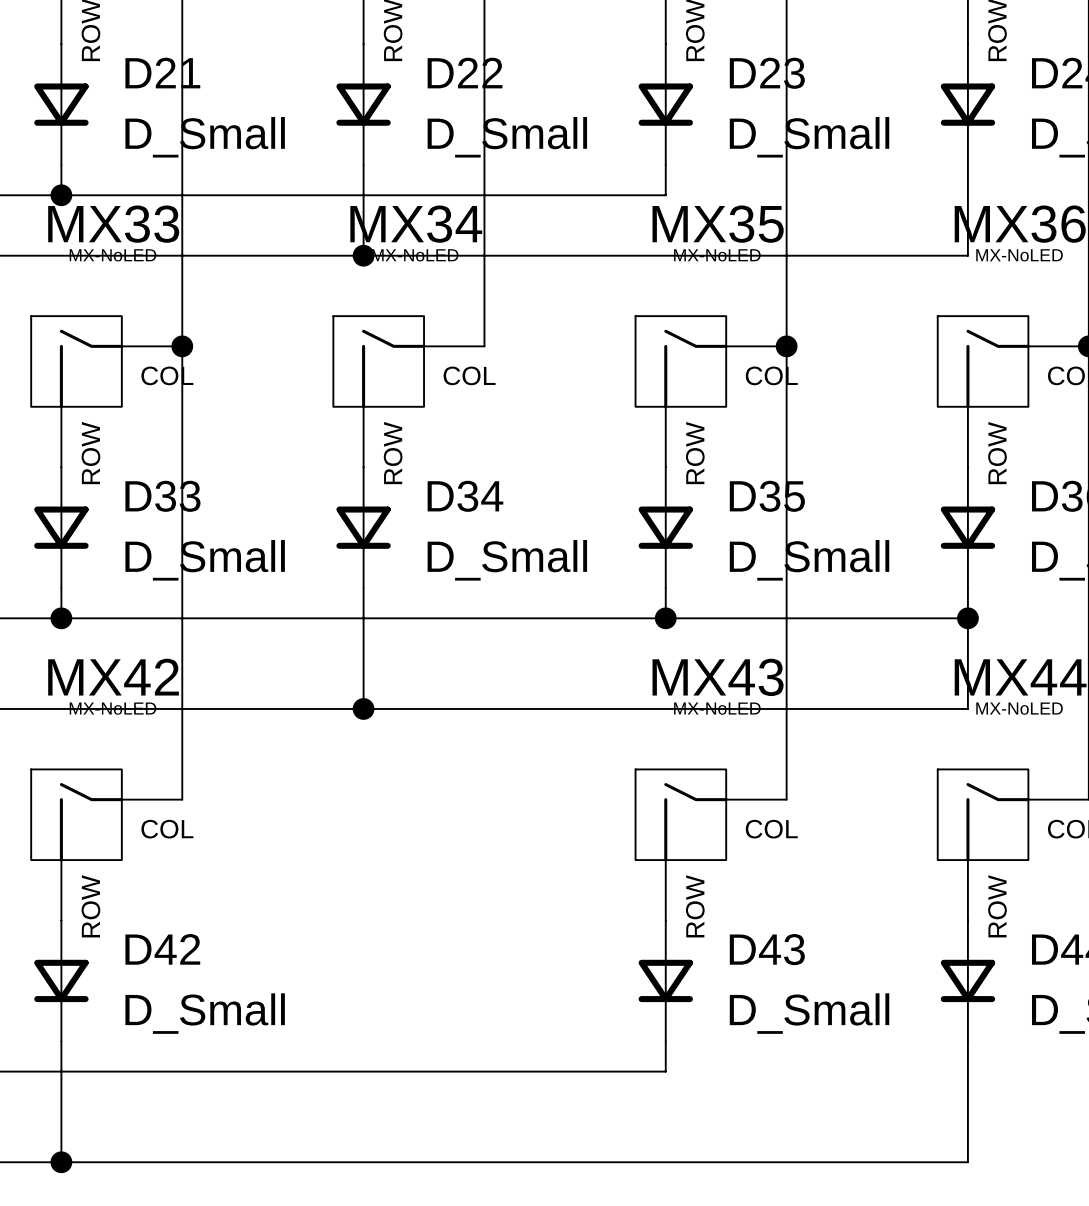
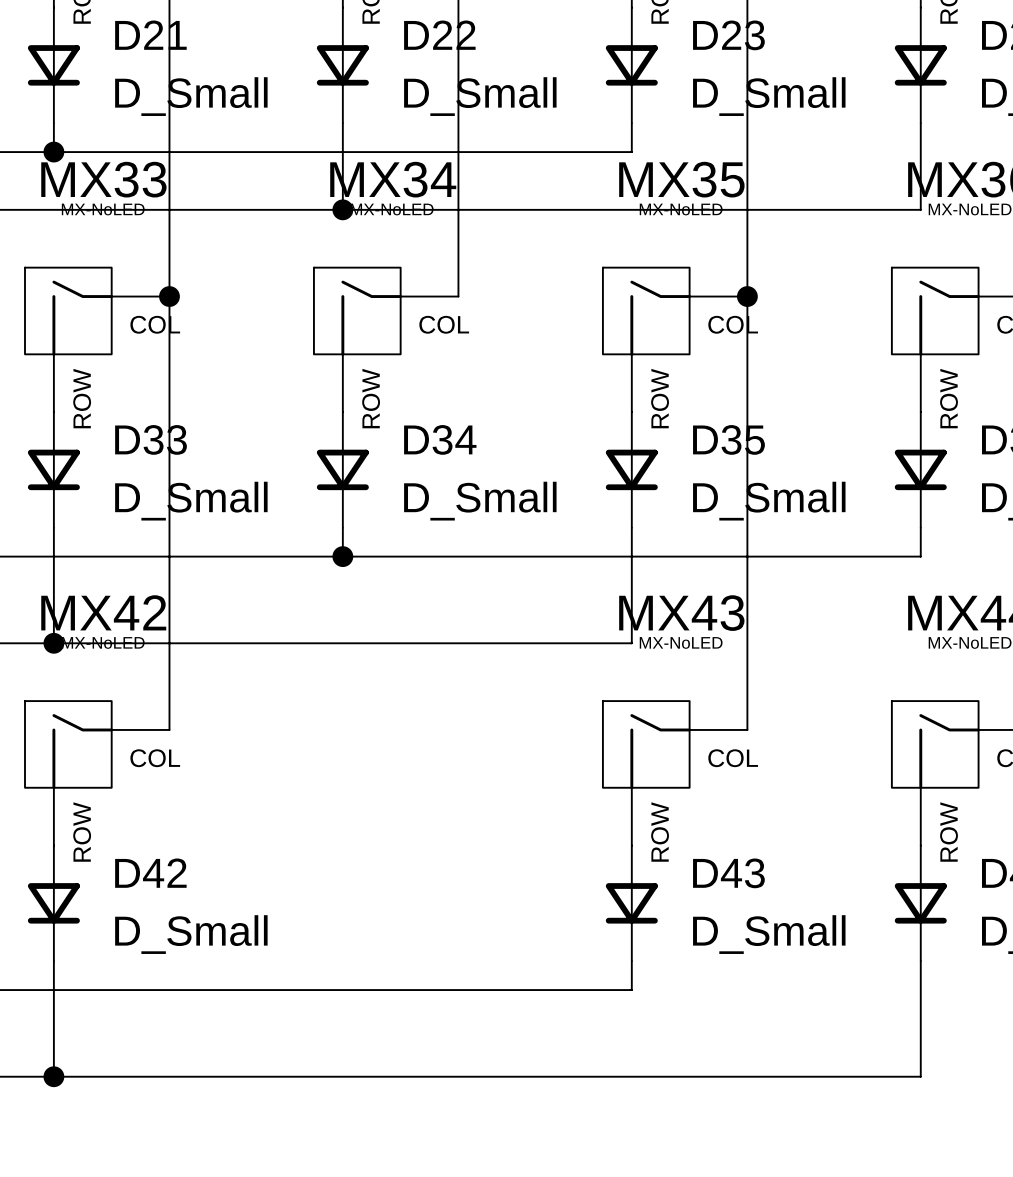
junction position: (61, 618) -> (53, 643)
wire: (363, 618) (363, 708) -> (53, 556) (53, 643)
junction: (665, 618) -> none
wire: (967, 618) (967, 708) (665, 708) -> (631, 556) (631, 643)
junction: (967, 618) -> none
junction position: (363, 708) -> (342, 556)

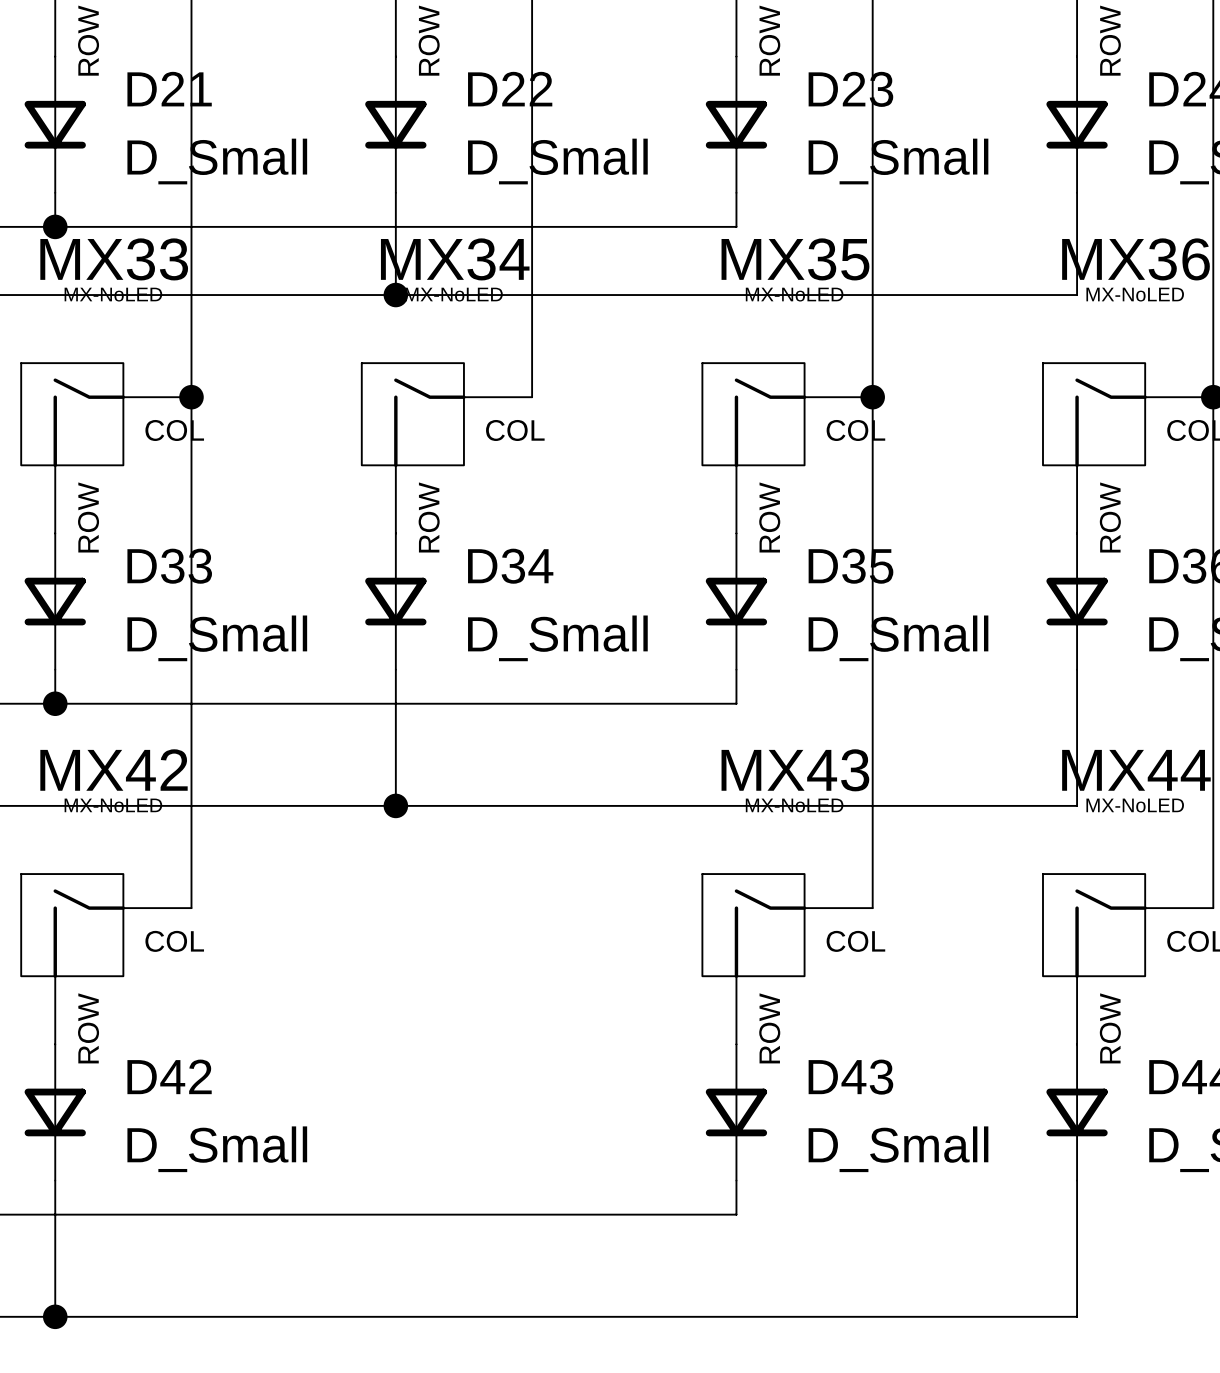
wire: (53, 556) (53, 643) -> (395, 703) (395, 805)
junction position: (342, 556) -> (395, 805)
wire: (920, 556) (631, 556) (631, 643) -> (1077, 703) (1077, 805) (736, 805)
junction position: (53, 643) -> (55, 703)

